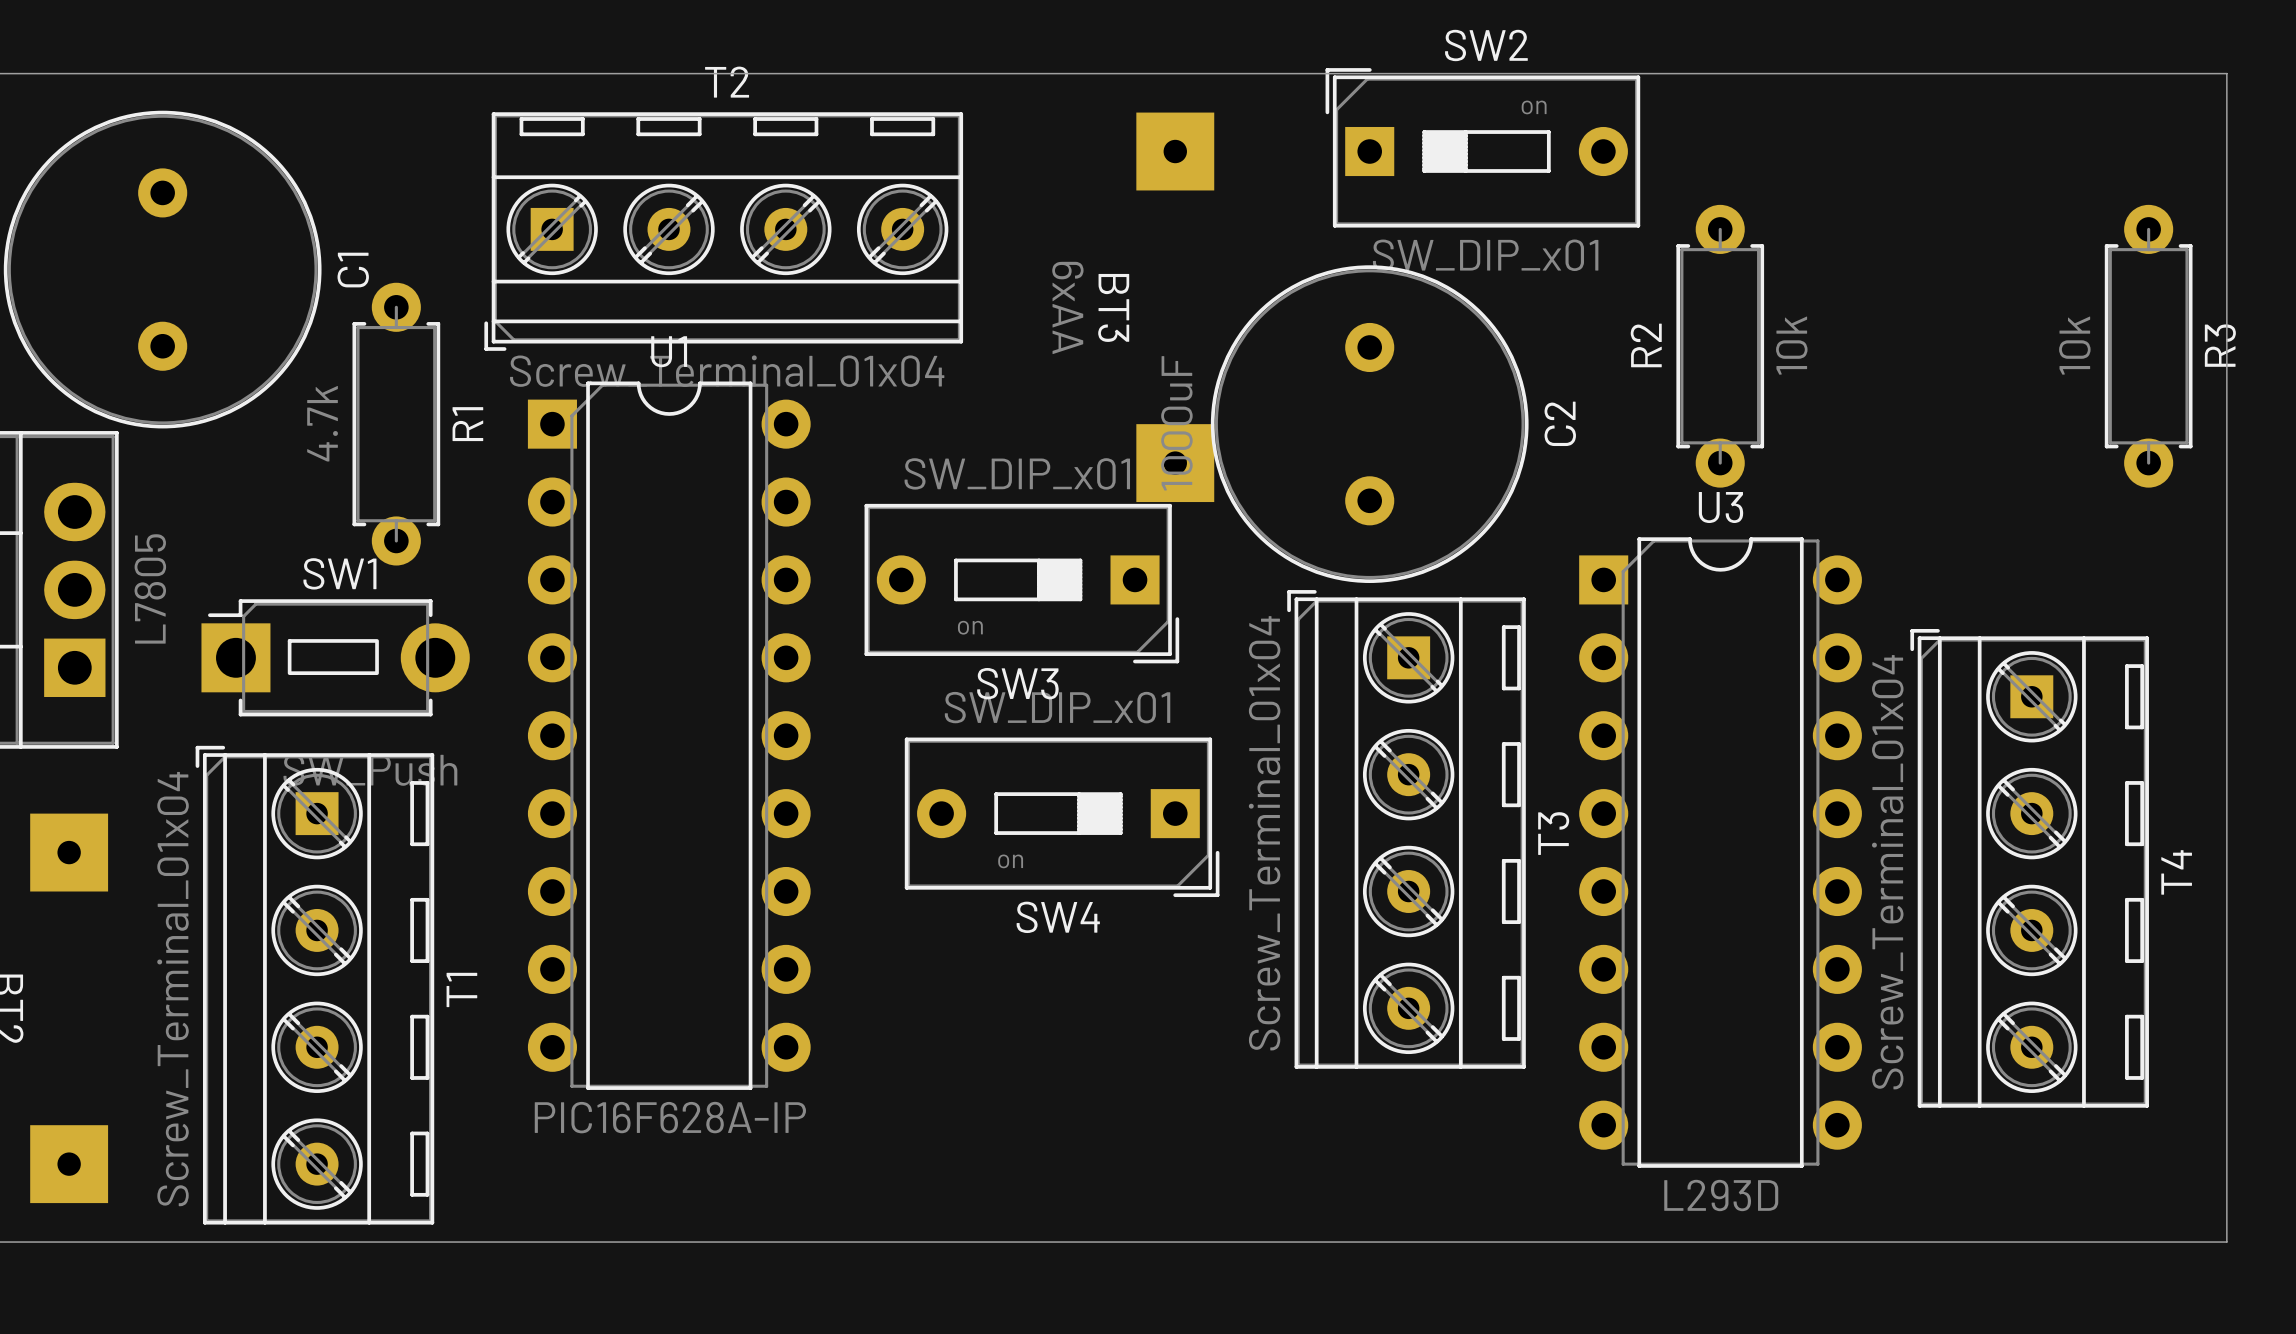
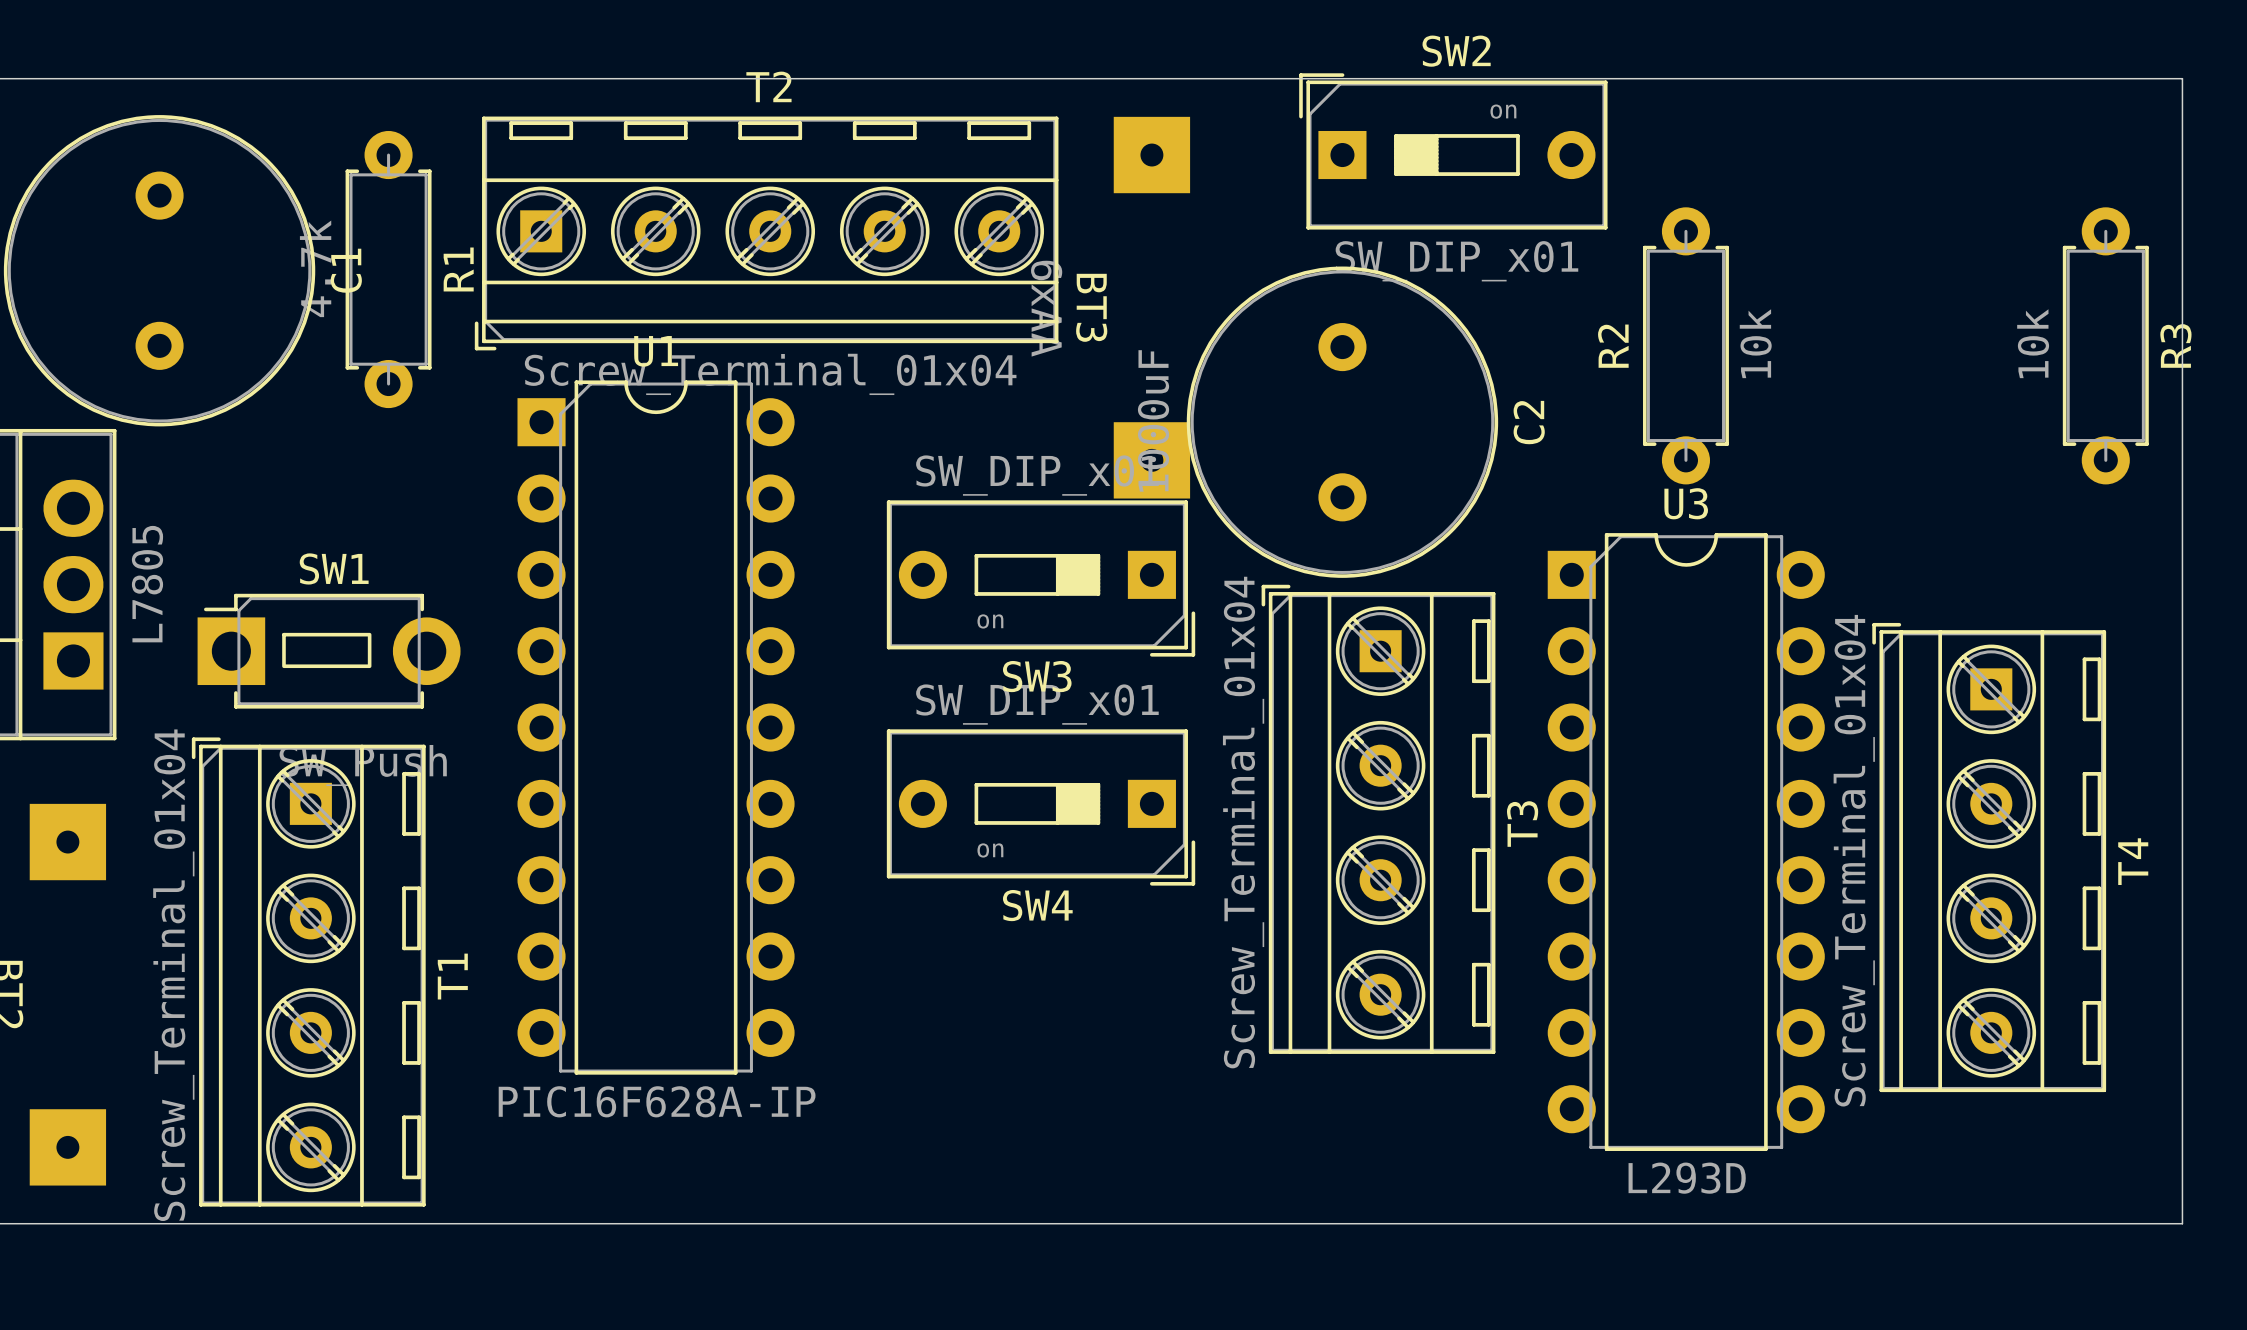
T2 footprint: [484, 112, 964, 351] -> [474, 116, 1059, 351]
R1 position: (396, 424) -> (388, 269)
SW3 position: (1021, 583) -> (1041, 578)

